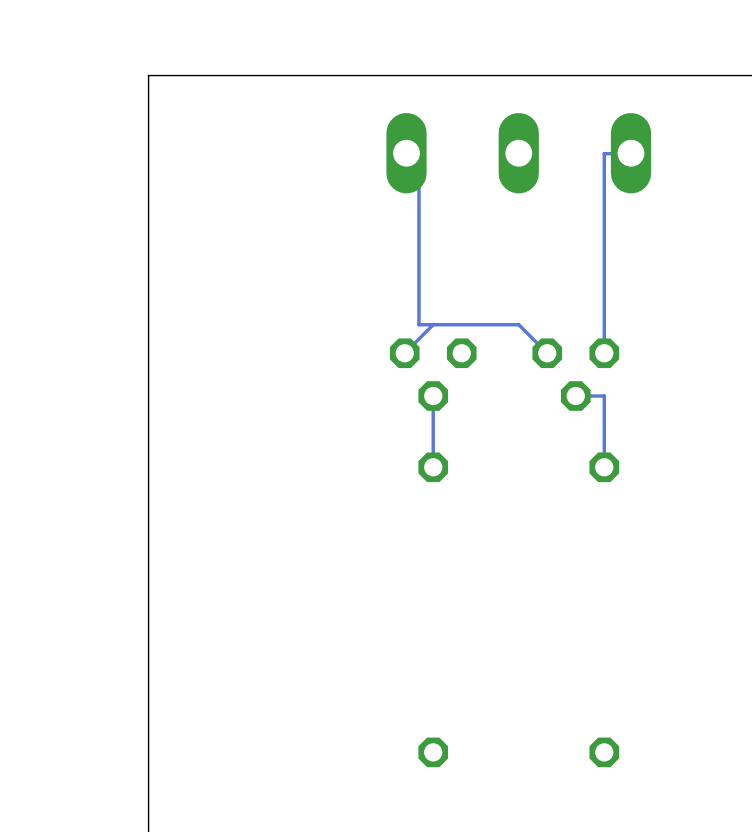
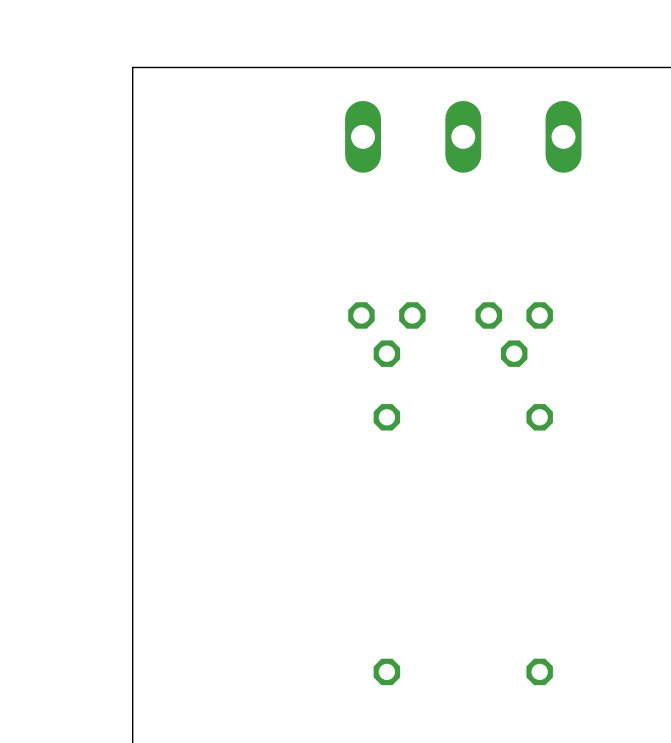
track: (406, 153) (418, 153) (418, 324) (518, 324) (547, 353) -> none
track: (631, 153) (604, 153) (604, 353) -> none
track: (433, 324) (404, 353) -> none
track: (433, 396) (433, 467) -> none
track: (575, 396) (604, 396) (604, 467) -> none

